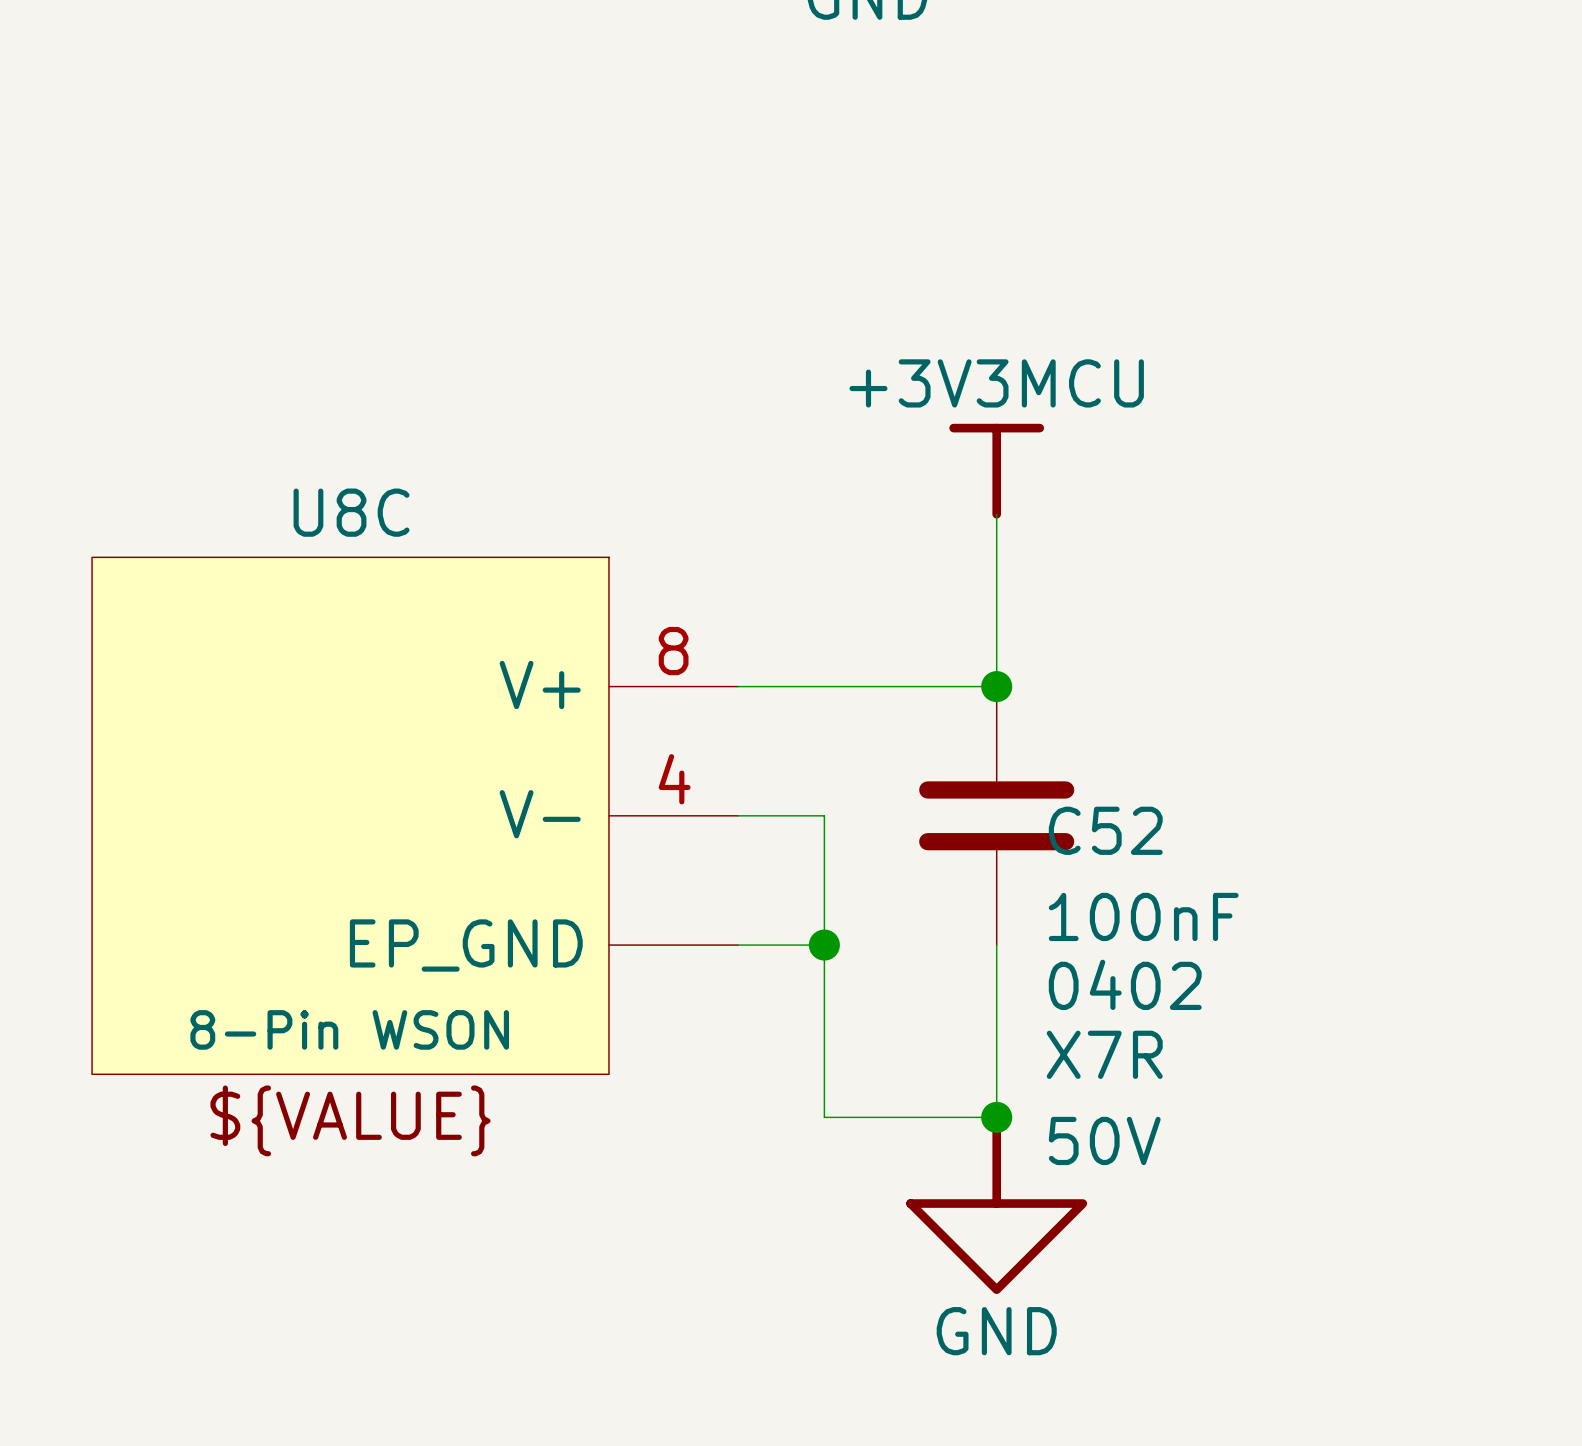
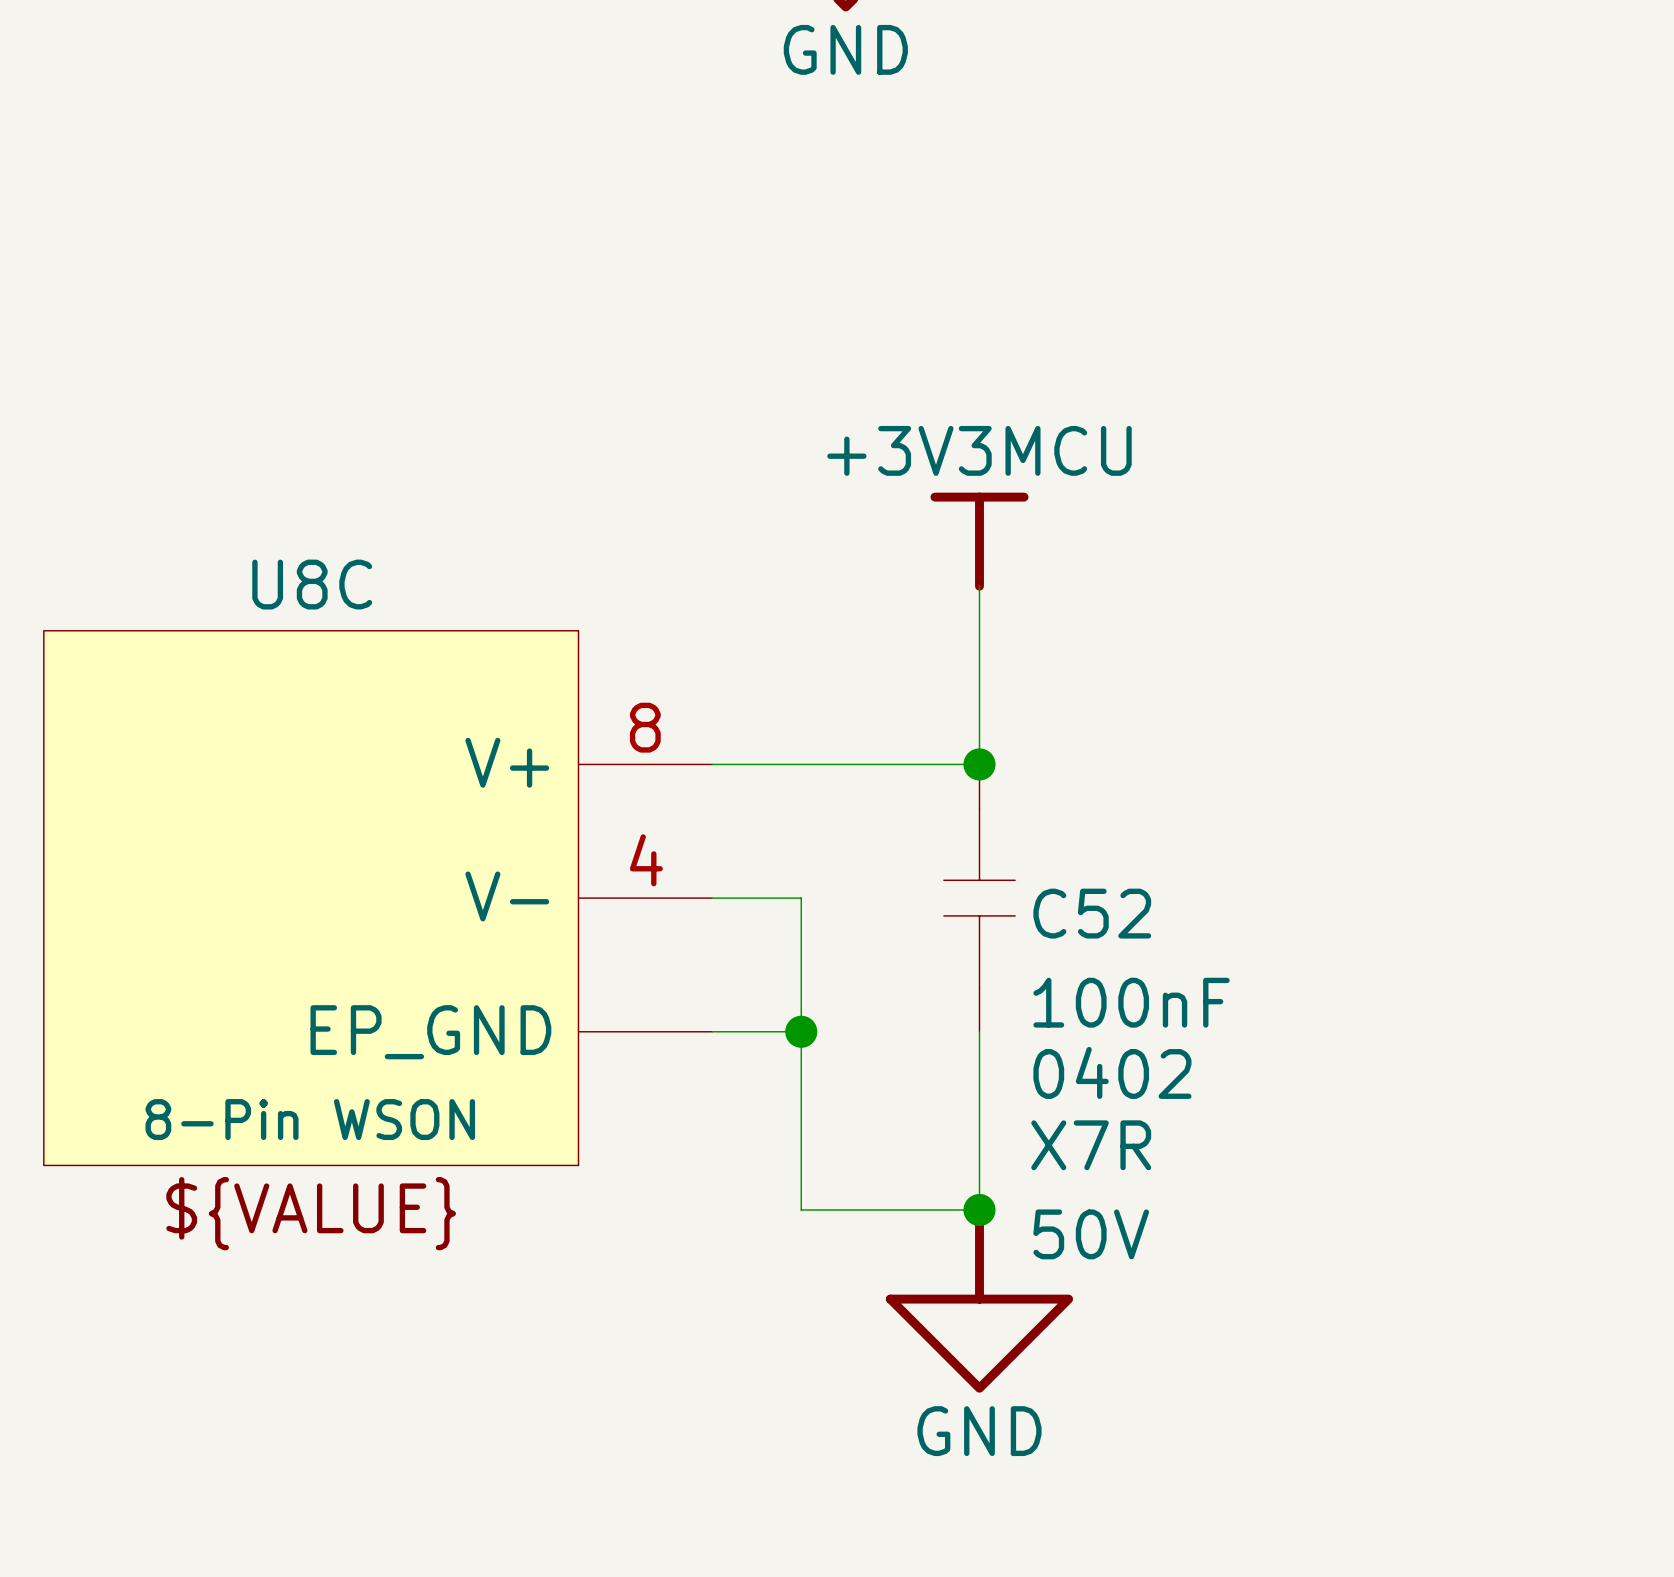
C52 symbol: [919, 686, 1075, 946] -> [943, 764, 1016, 1032]

